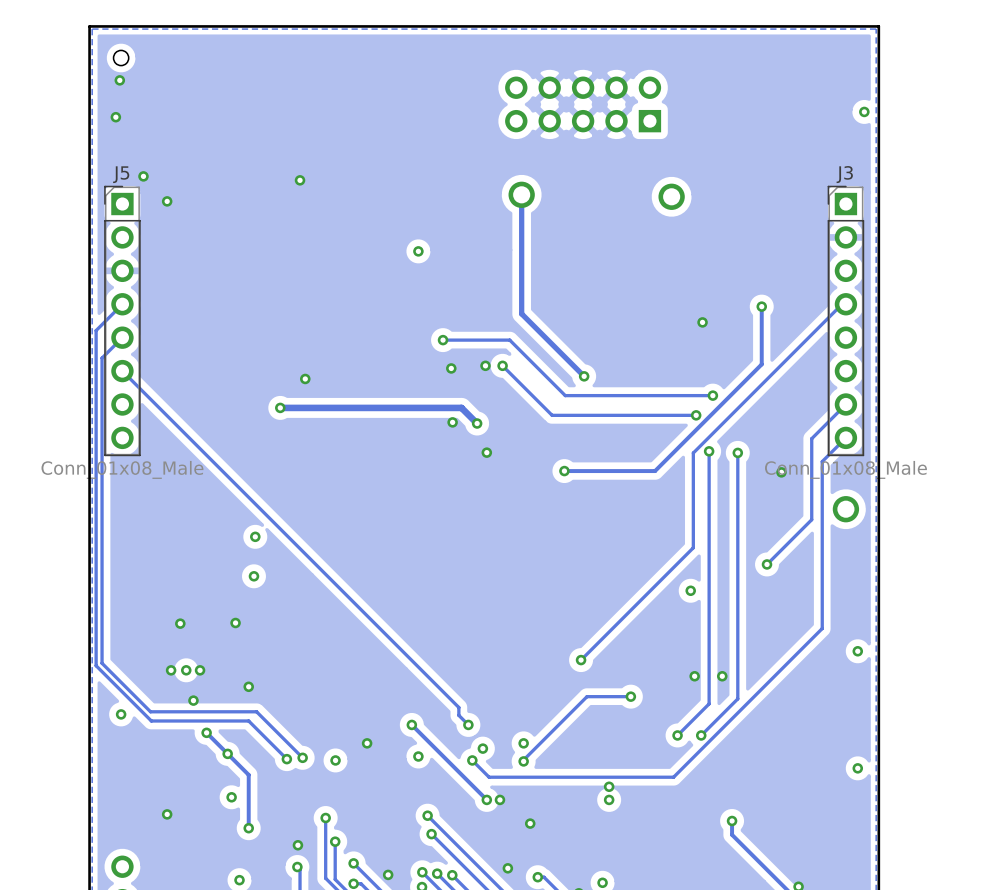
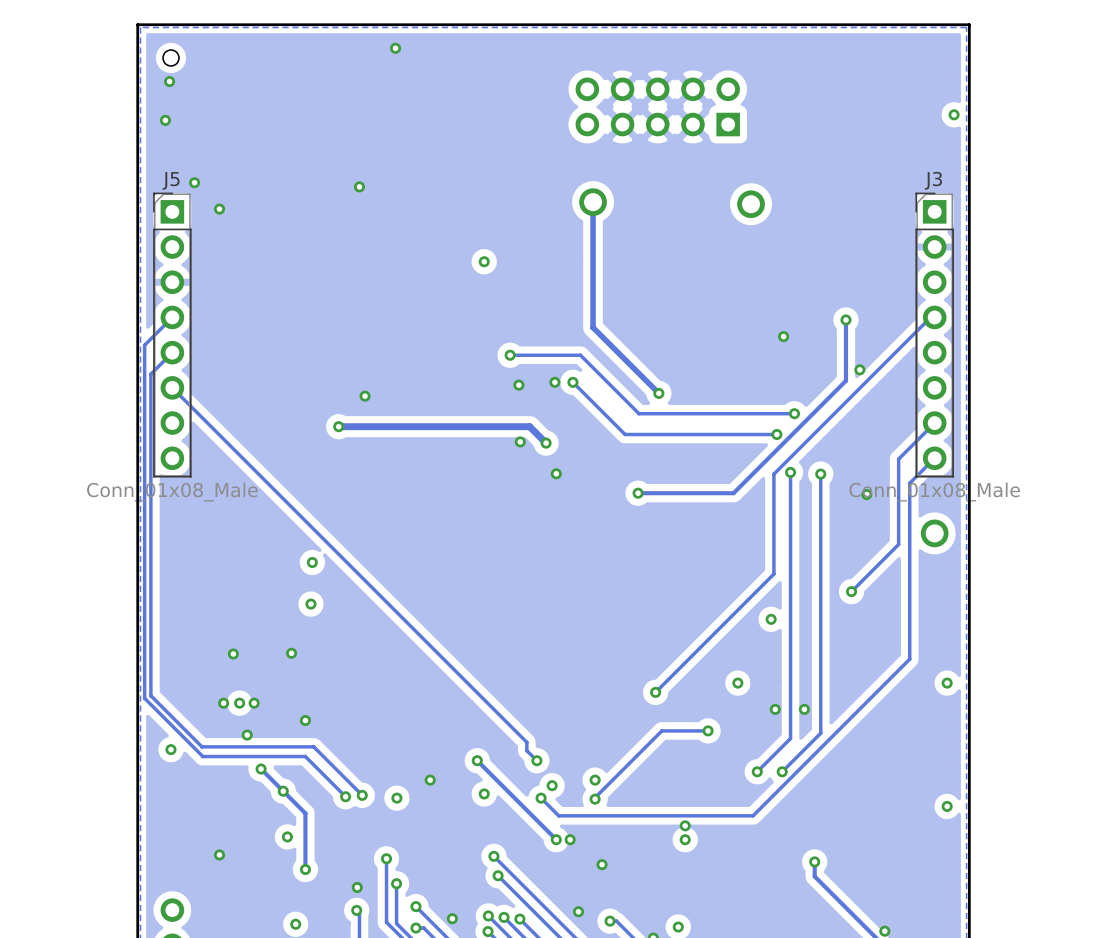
via: none -> (395, 48)
via: none -> (859, 369)
via: none -> (737, 683)

